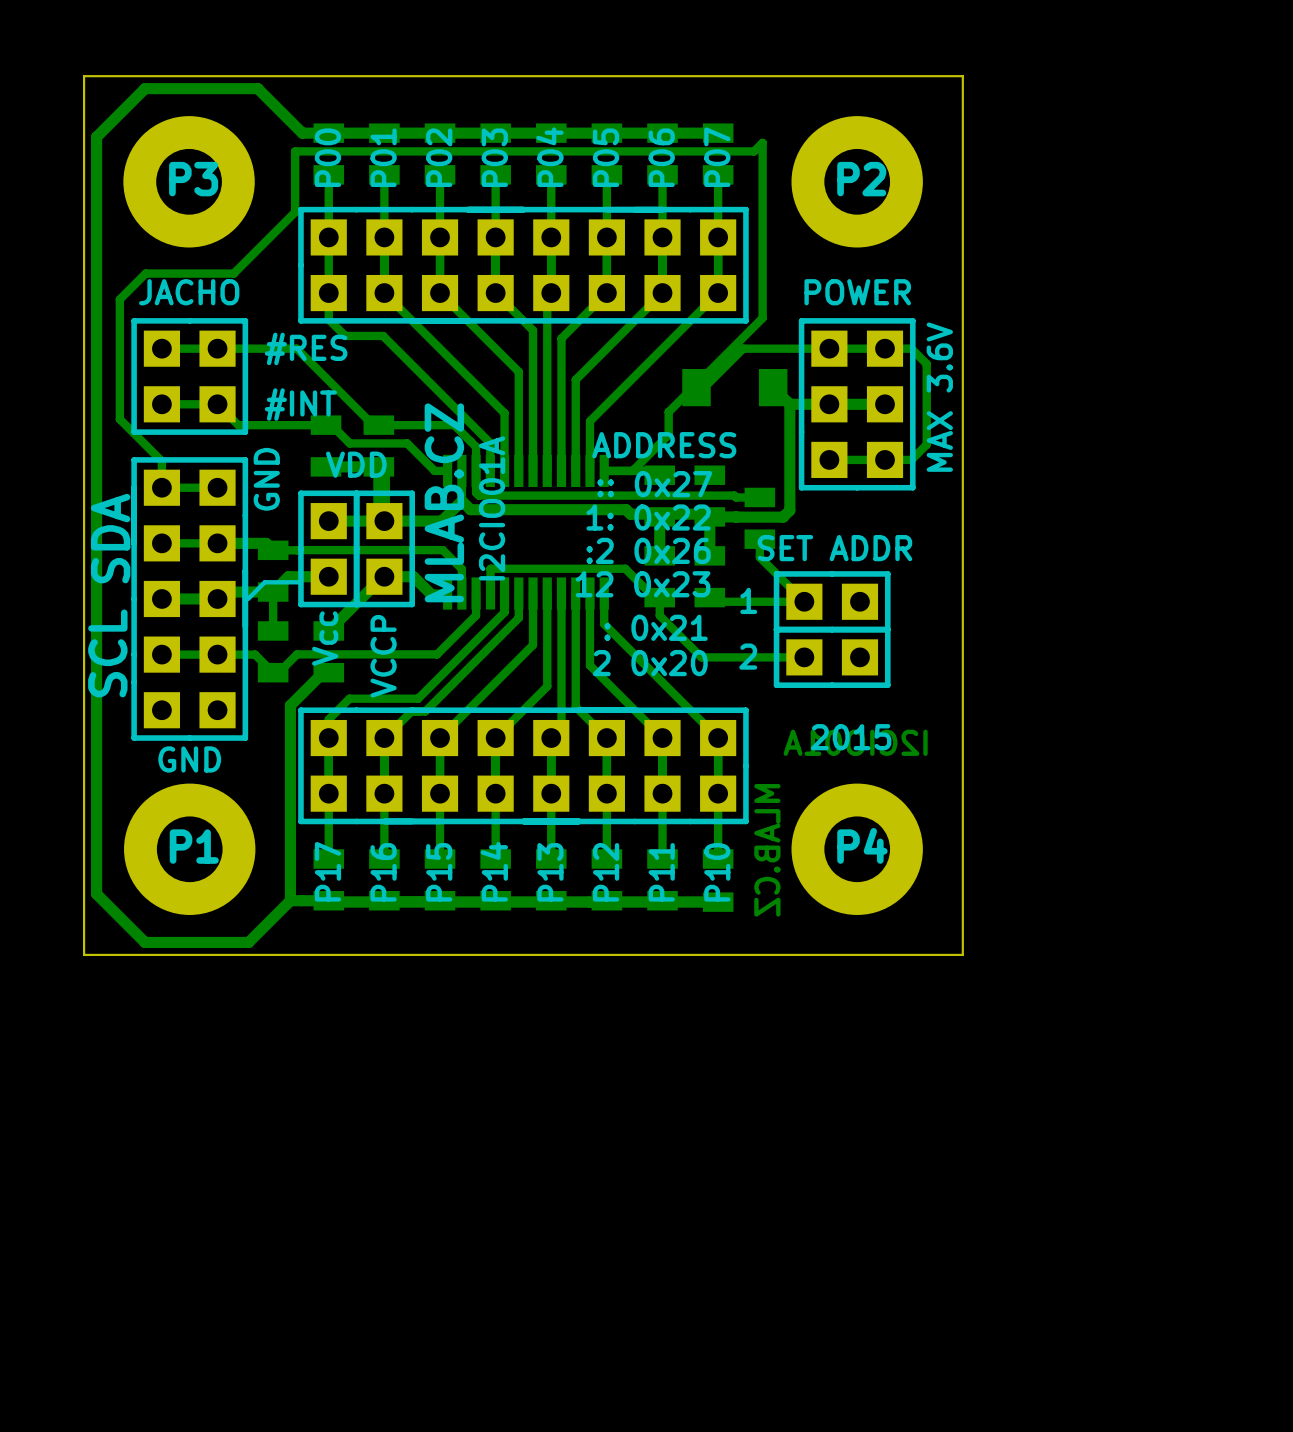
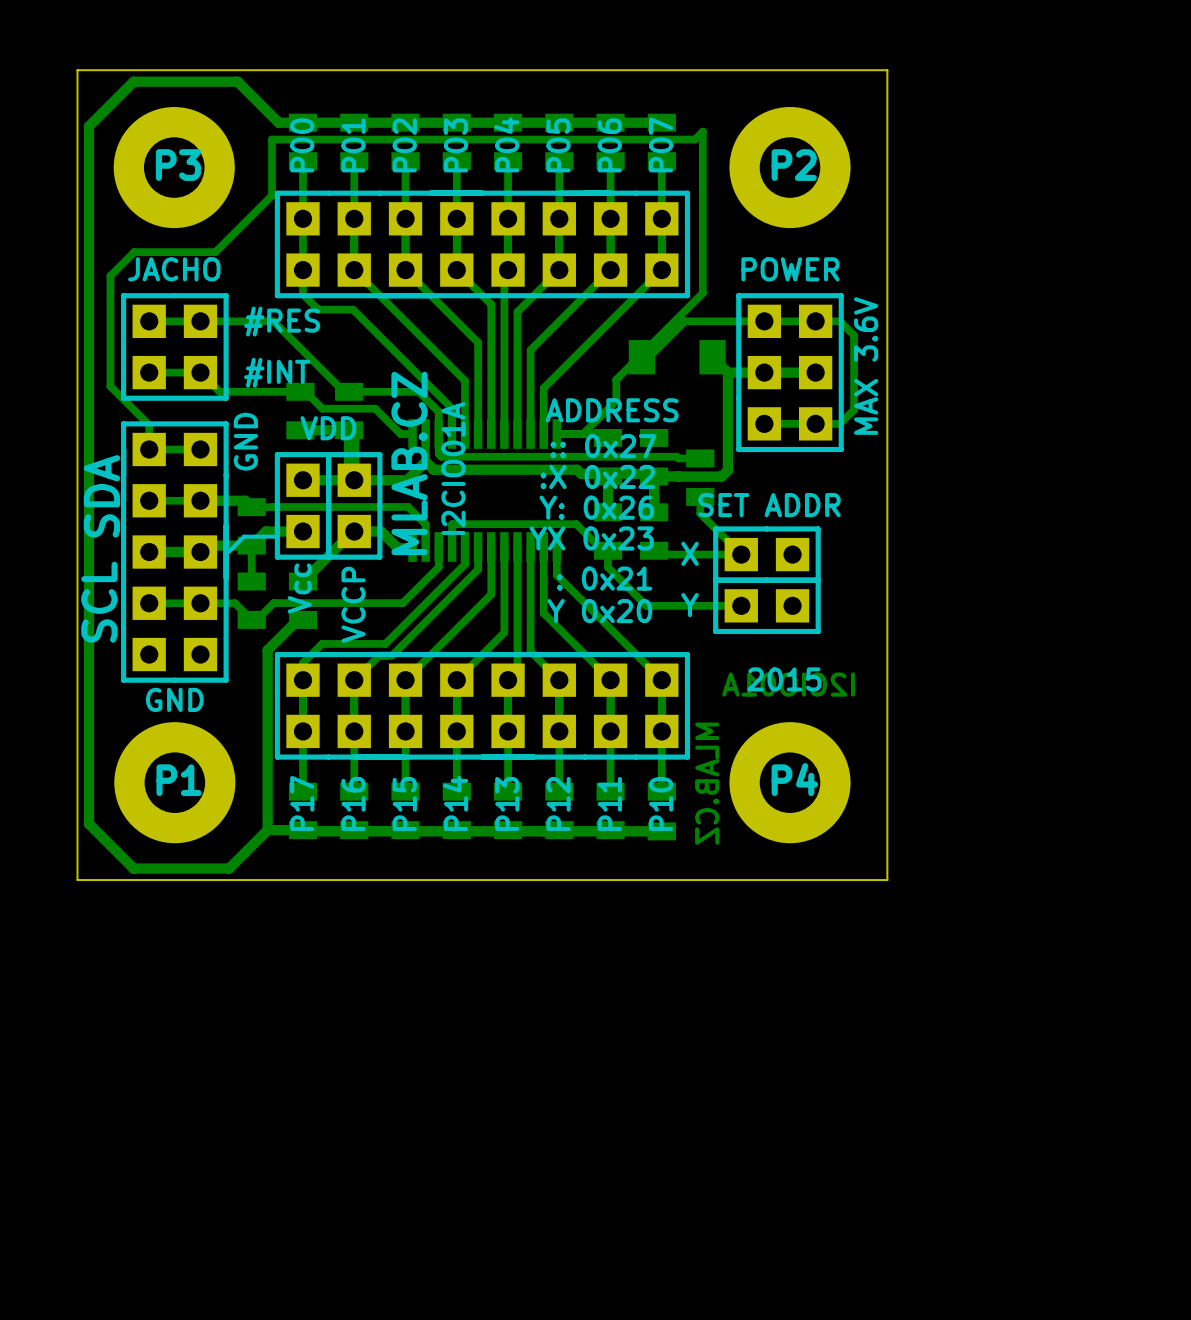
text: 1: 0x22 (648, 517) -> :X 0x22 (597, 476)
text: :2 0x26 (648, 550) -> Y: 0x26 (596, 507)
text: 12 0x23 (643, 584) -> YX 0x23 (591, 538)
text: 1 (748, 600) -> X (690, 553)
text: 2 (748, 656) -> Y (690, 605)
text: 2 0x20 (650, 663) -> Y 0x20 (599, 611)

